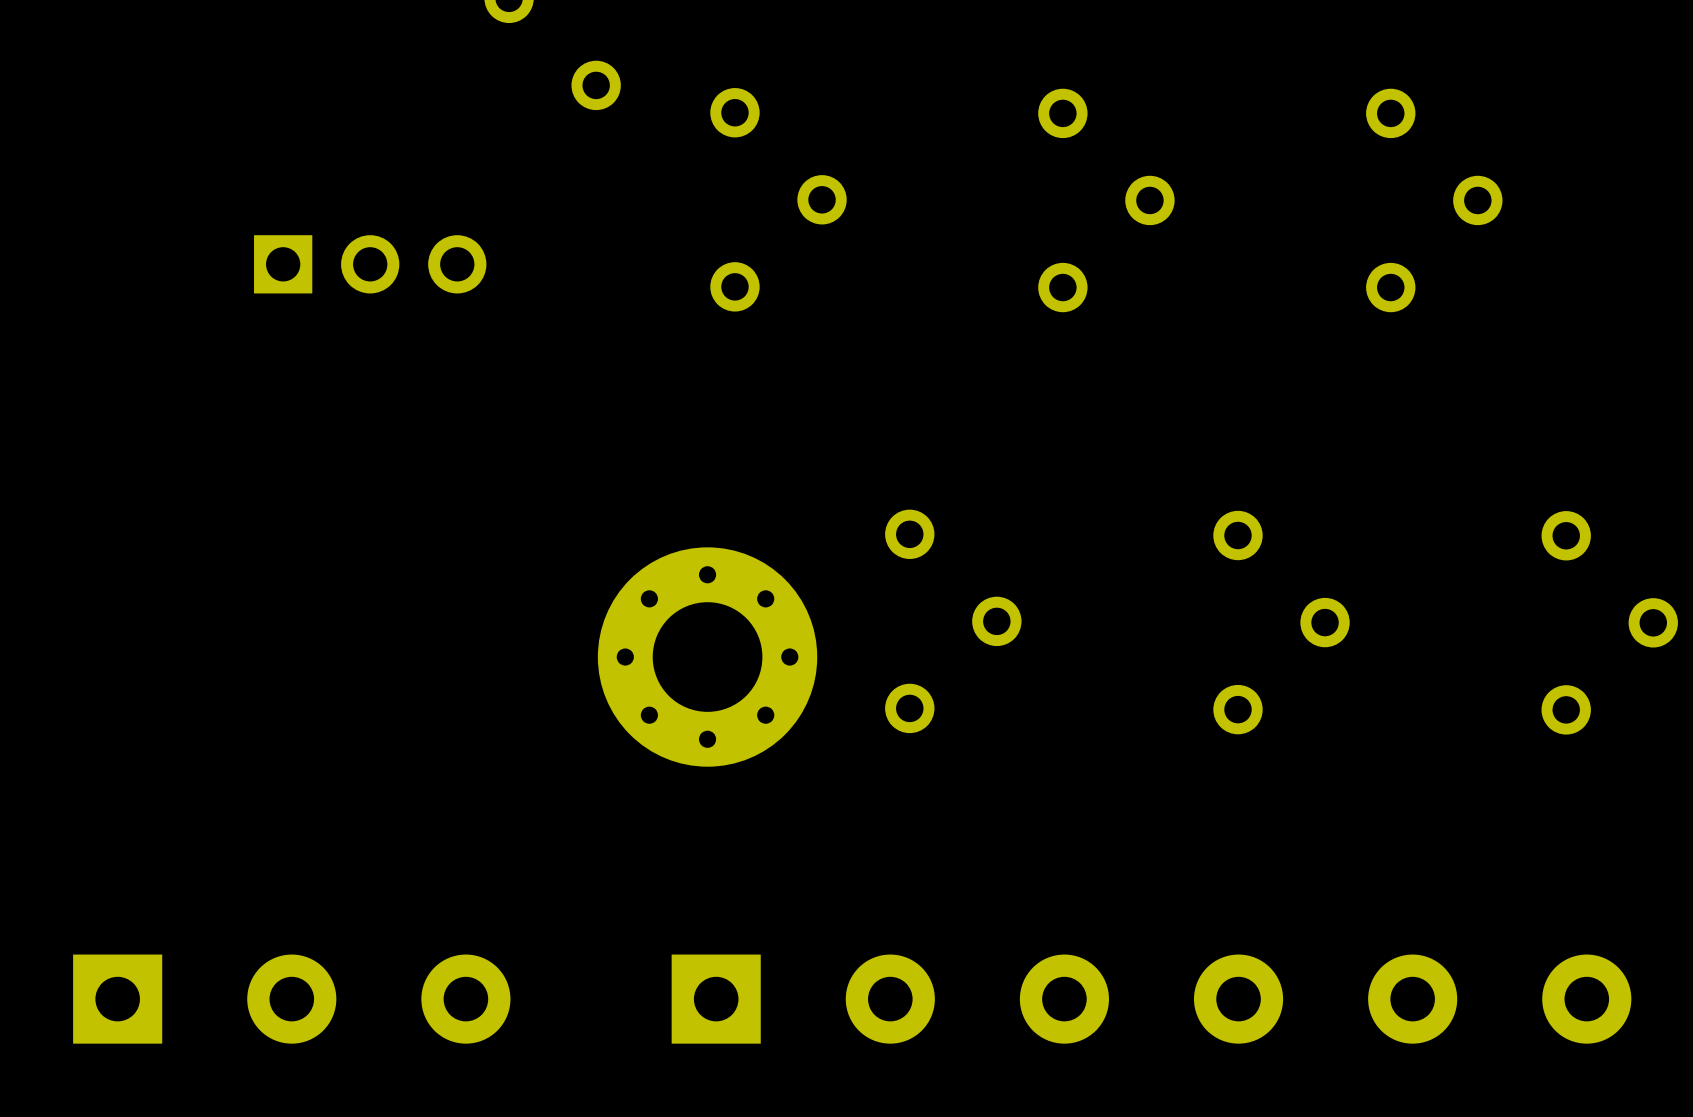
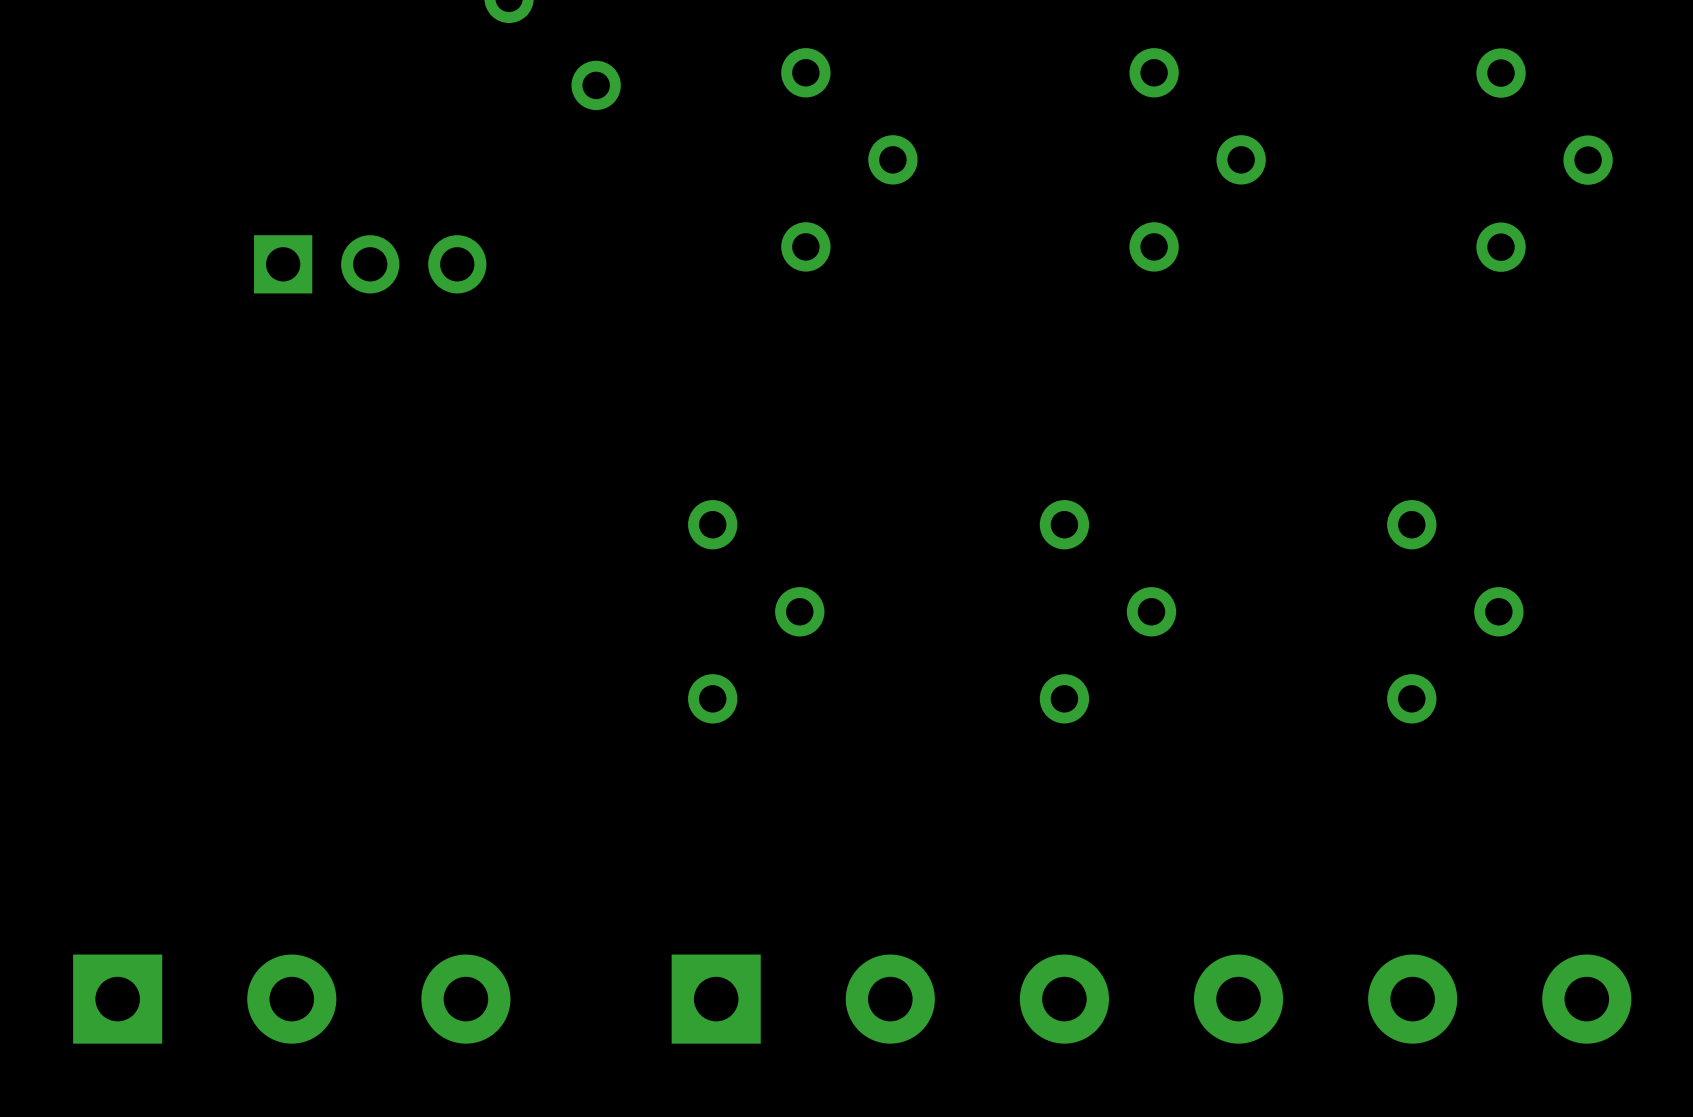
part: none -> (1544, 160)
part position: (778, 199) -> (849, 159)
part position: (1106, 200) -> (1197, 159)
part: (1434, 200) -> none
part: none -> (756, 611)
part: none -> (1107, 611)
part: none -> (1455, 611)
part: (953, 621) -> none
part: (1281, 622) -> none
part: (1609, 622) -> none
part: (707, 657) -> none

